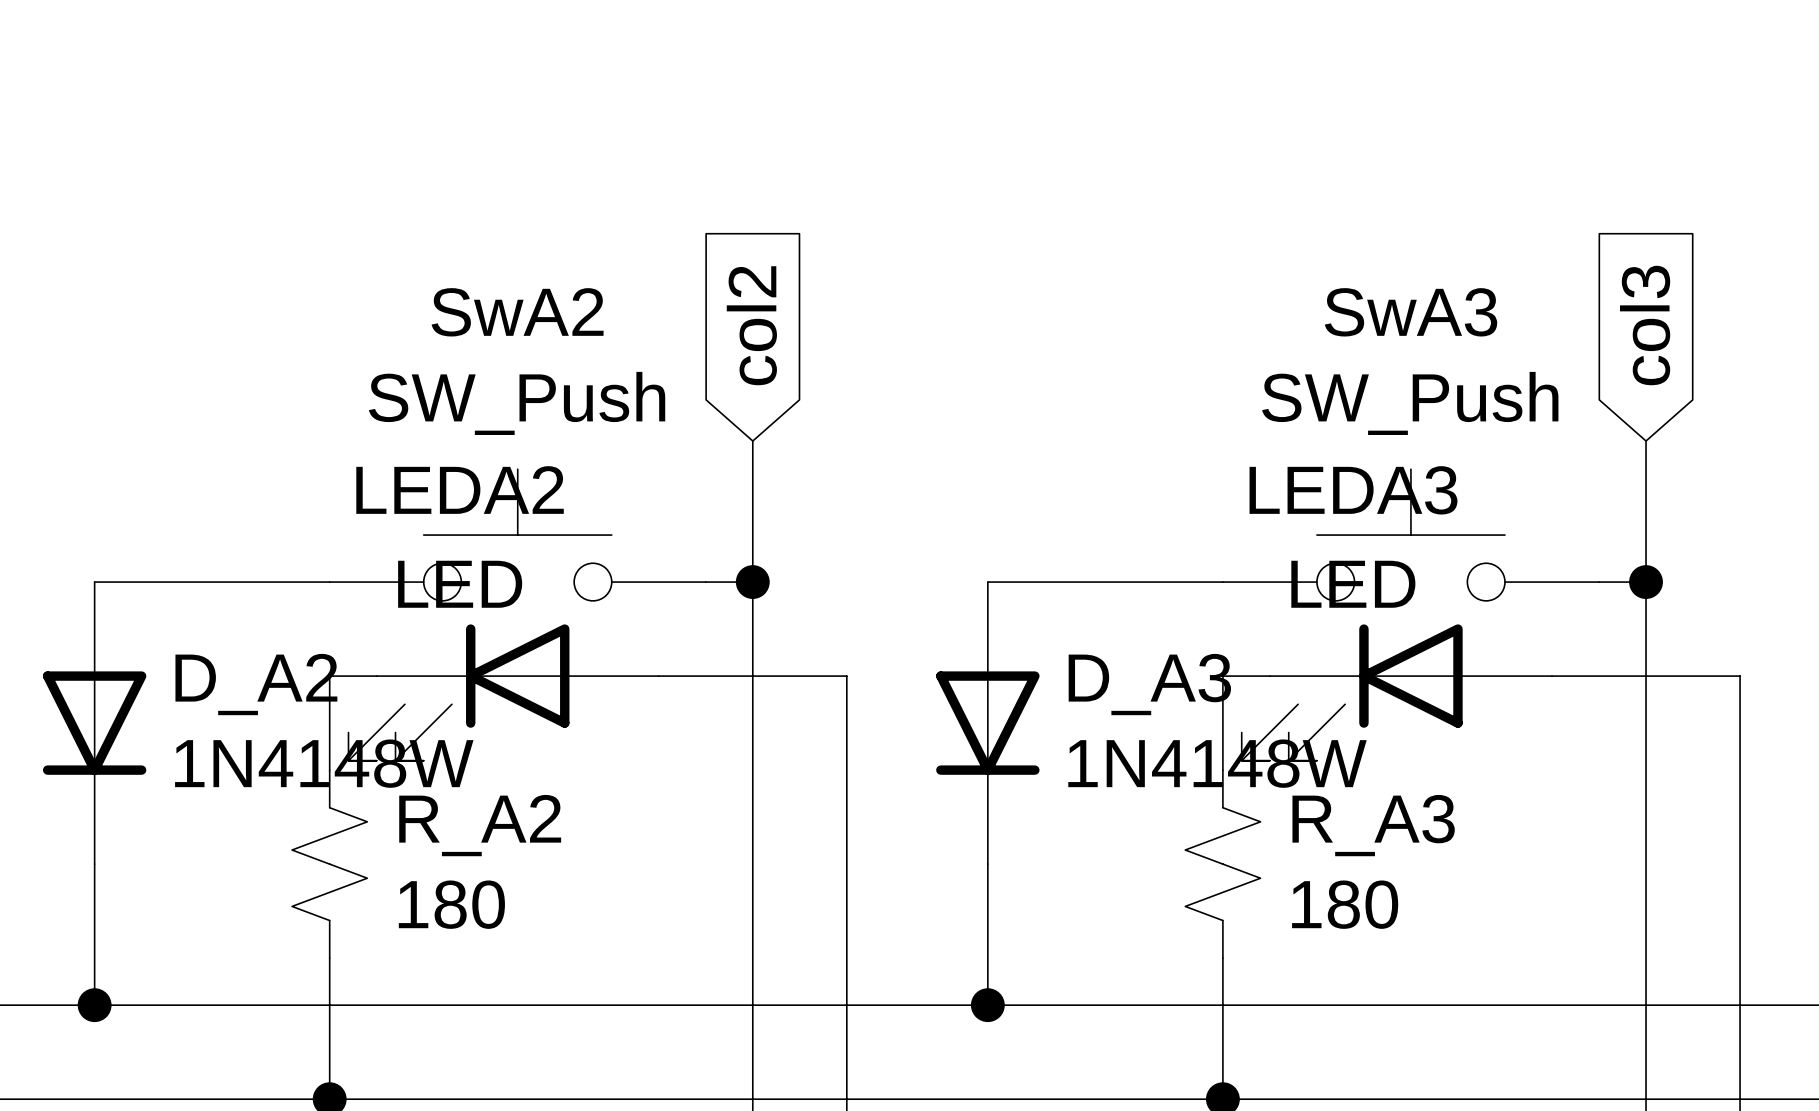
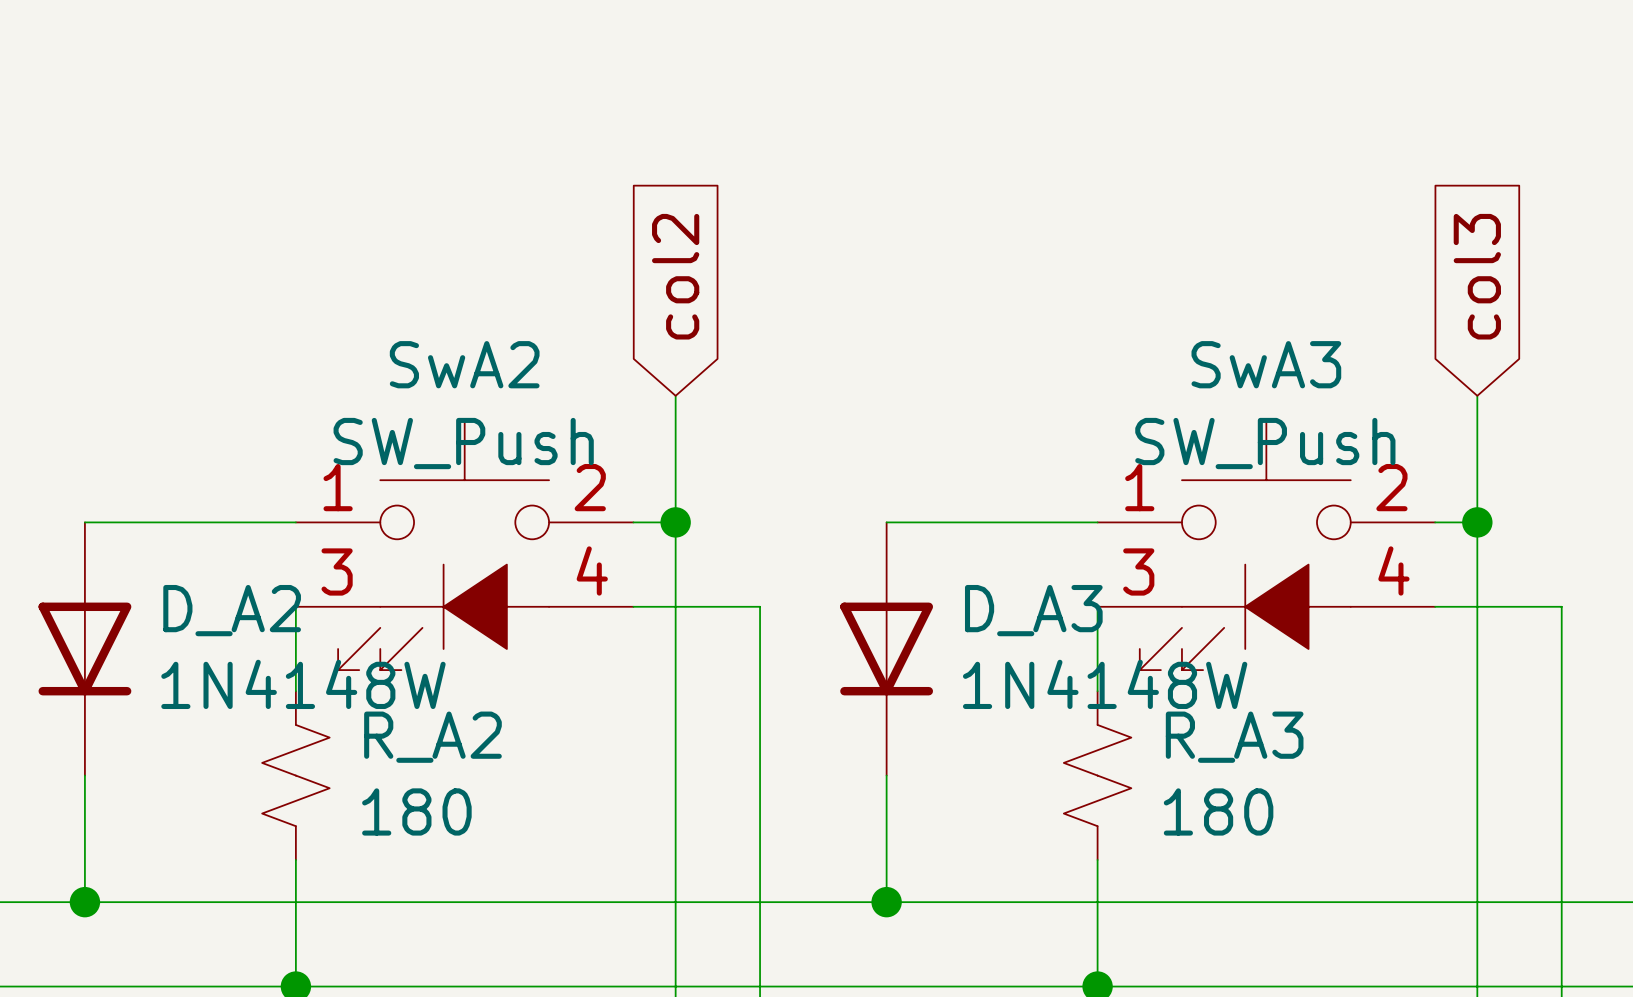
SwA2 symbol: [329, 469, 706, 601] -> [295, 421, 634, 671]
SwA3 symbol: [1222, 469, 1600, 601] -> [1097, 421, 1436, 671]
LEDA2: LED (503, 692) -> none
LEDA3: LED (1396, 692) -> none

